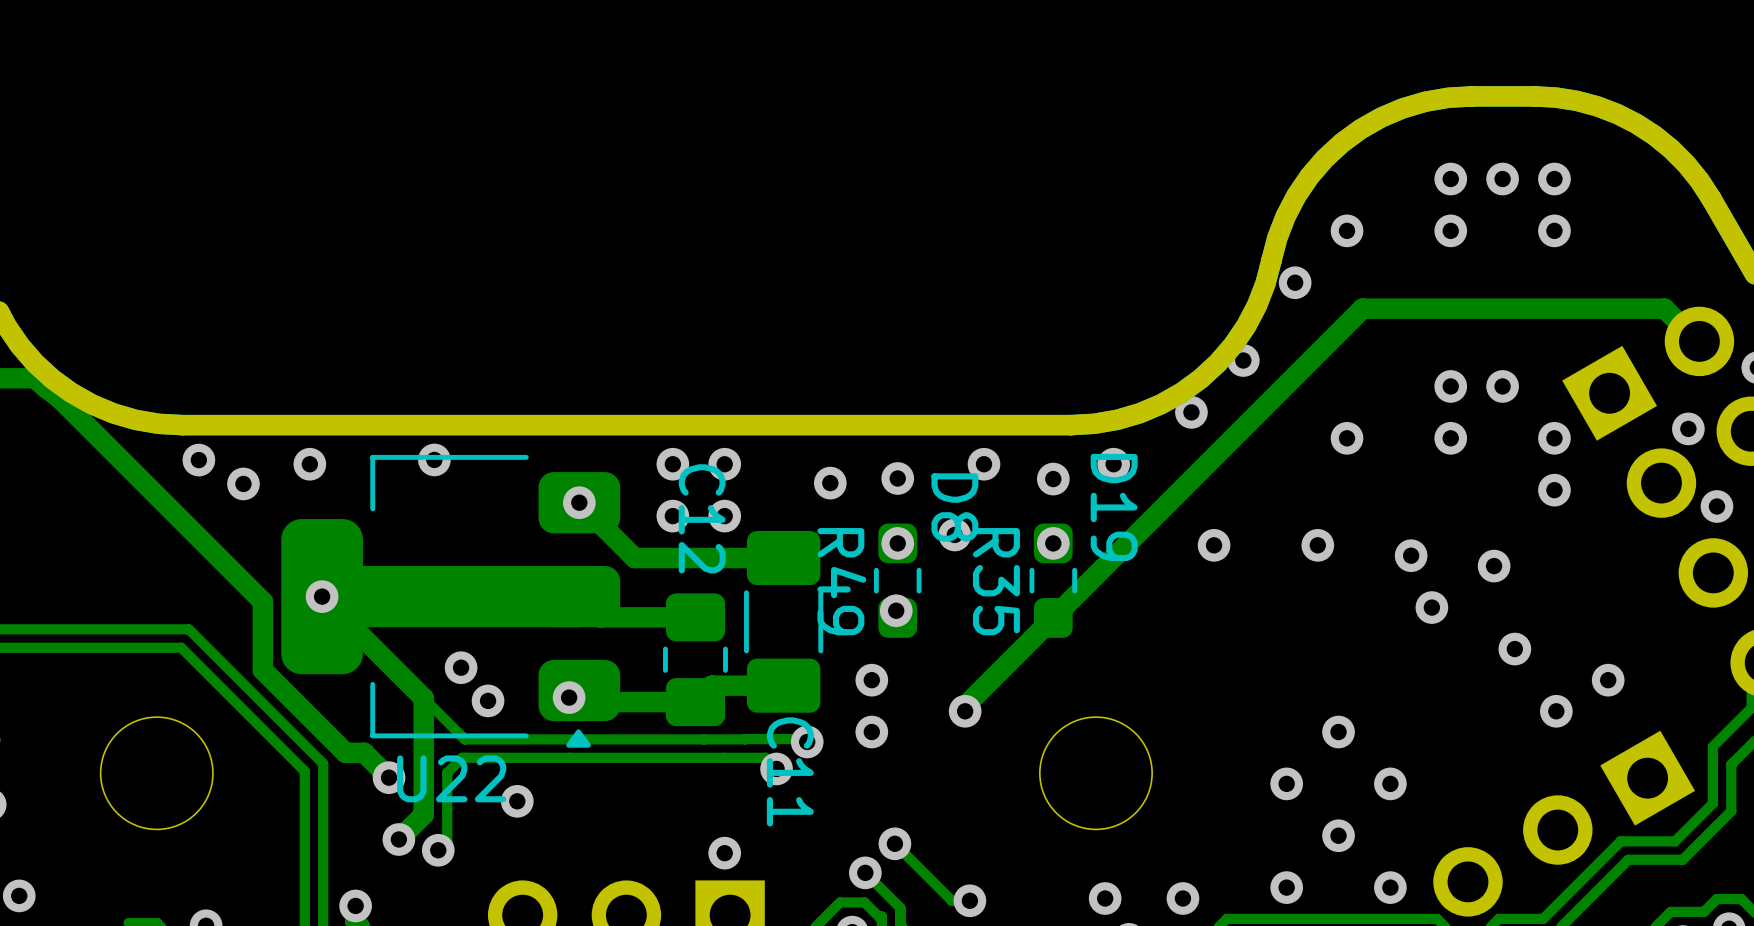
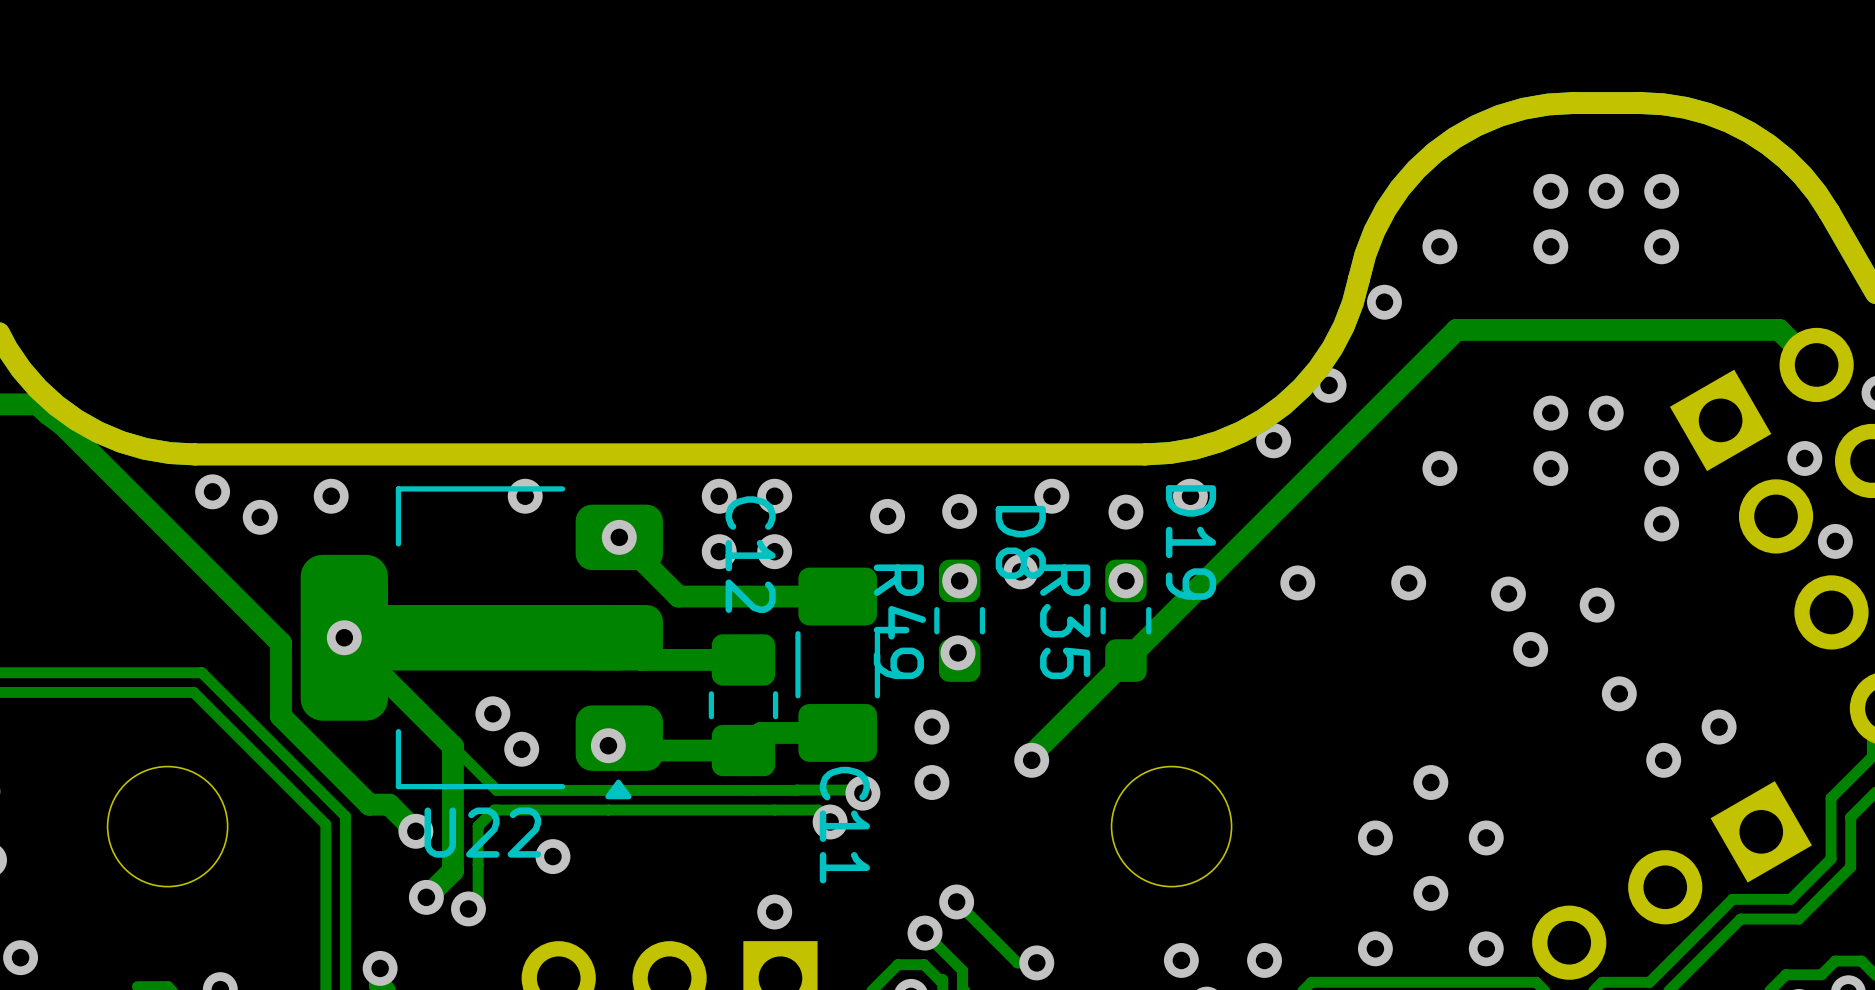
via position: (434, 459) -> (525, 496)

